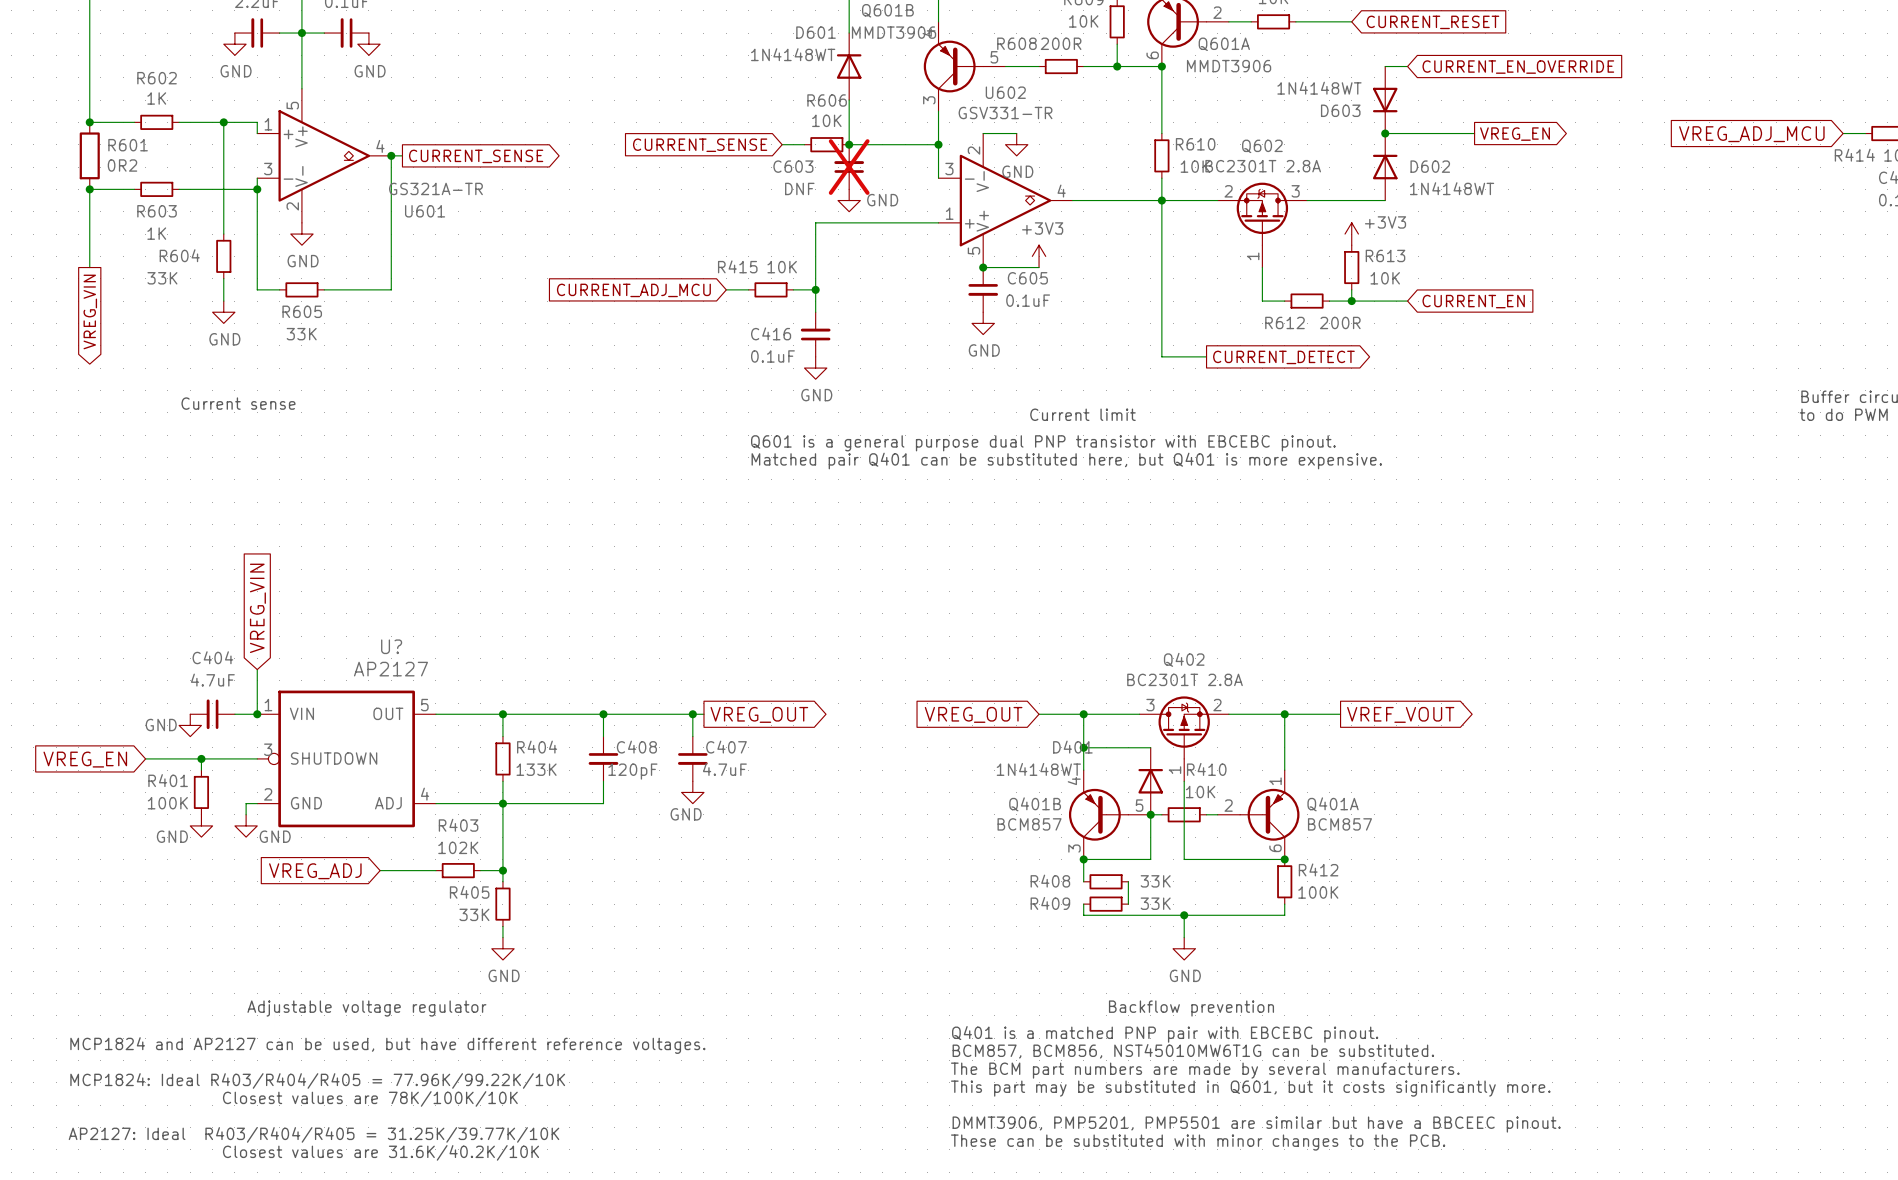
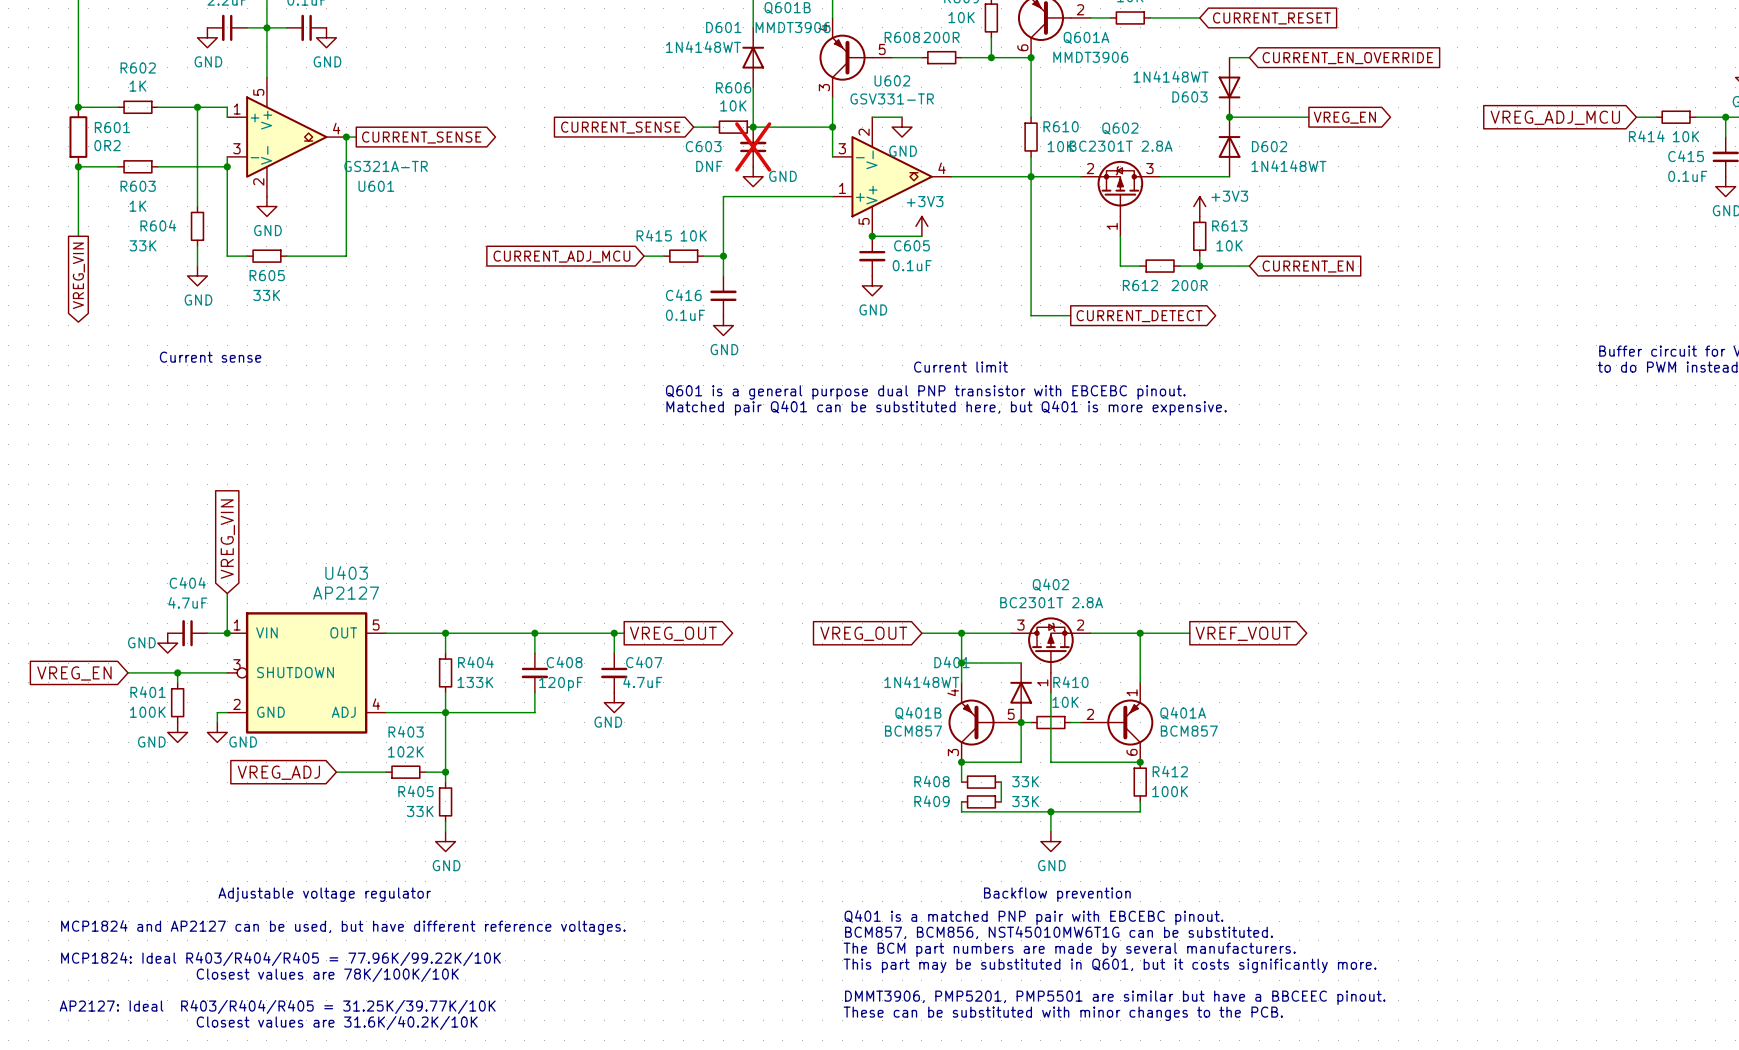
U? name: U? (391, 646) -> U403 (346, 572)

